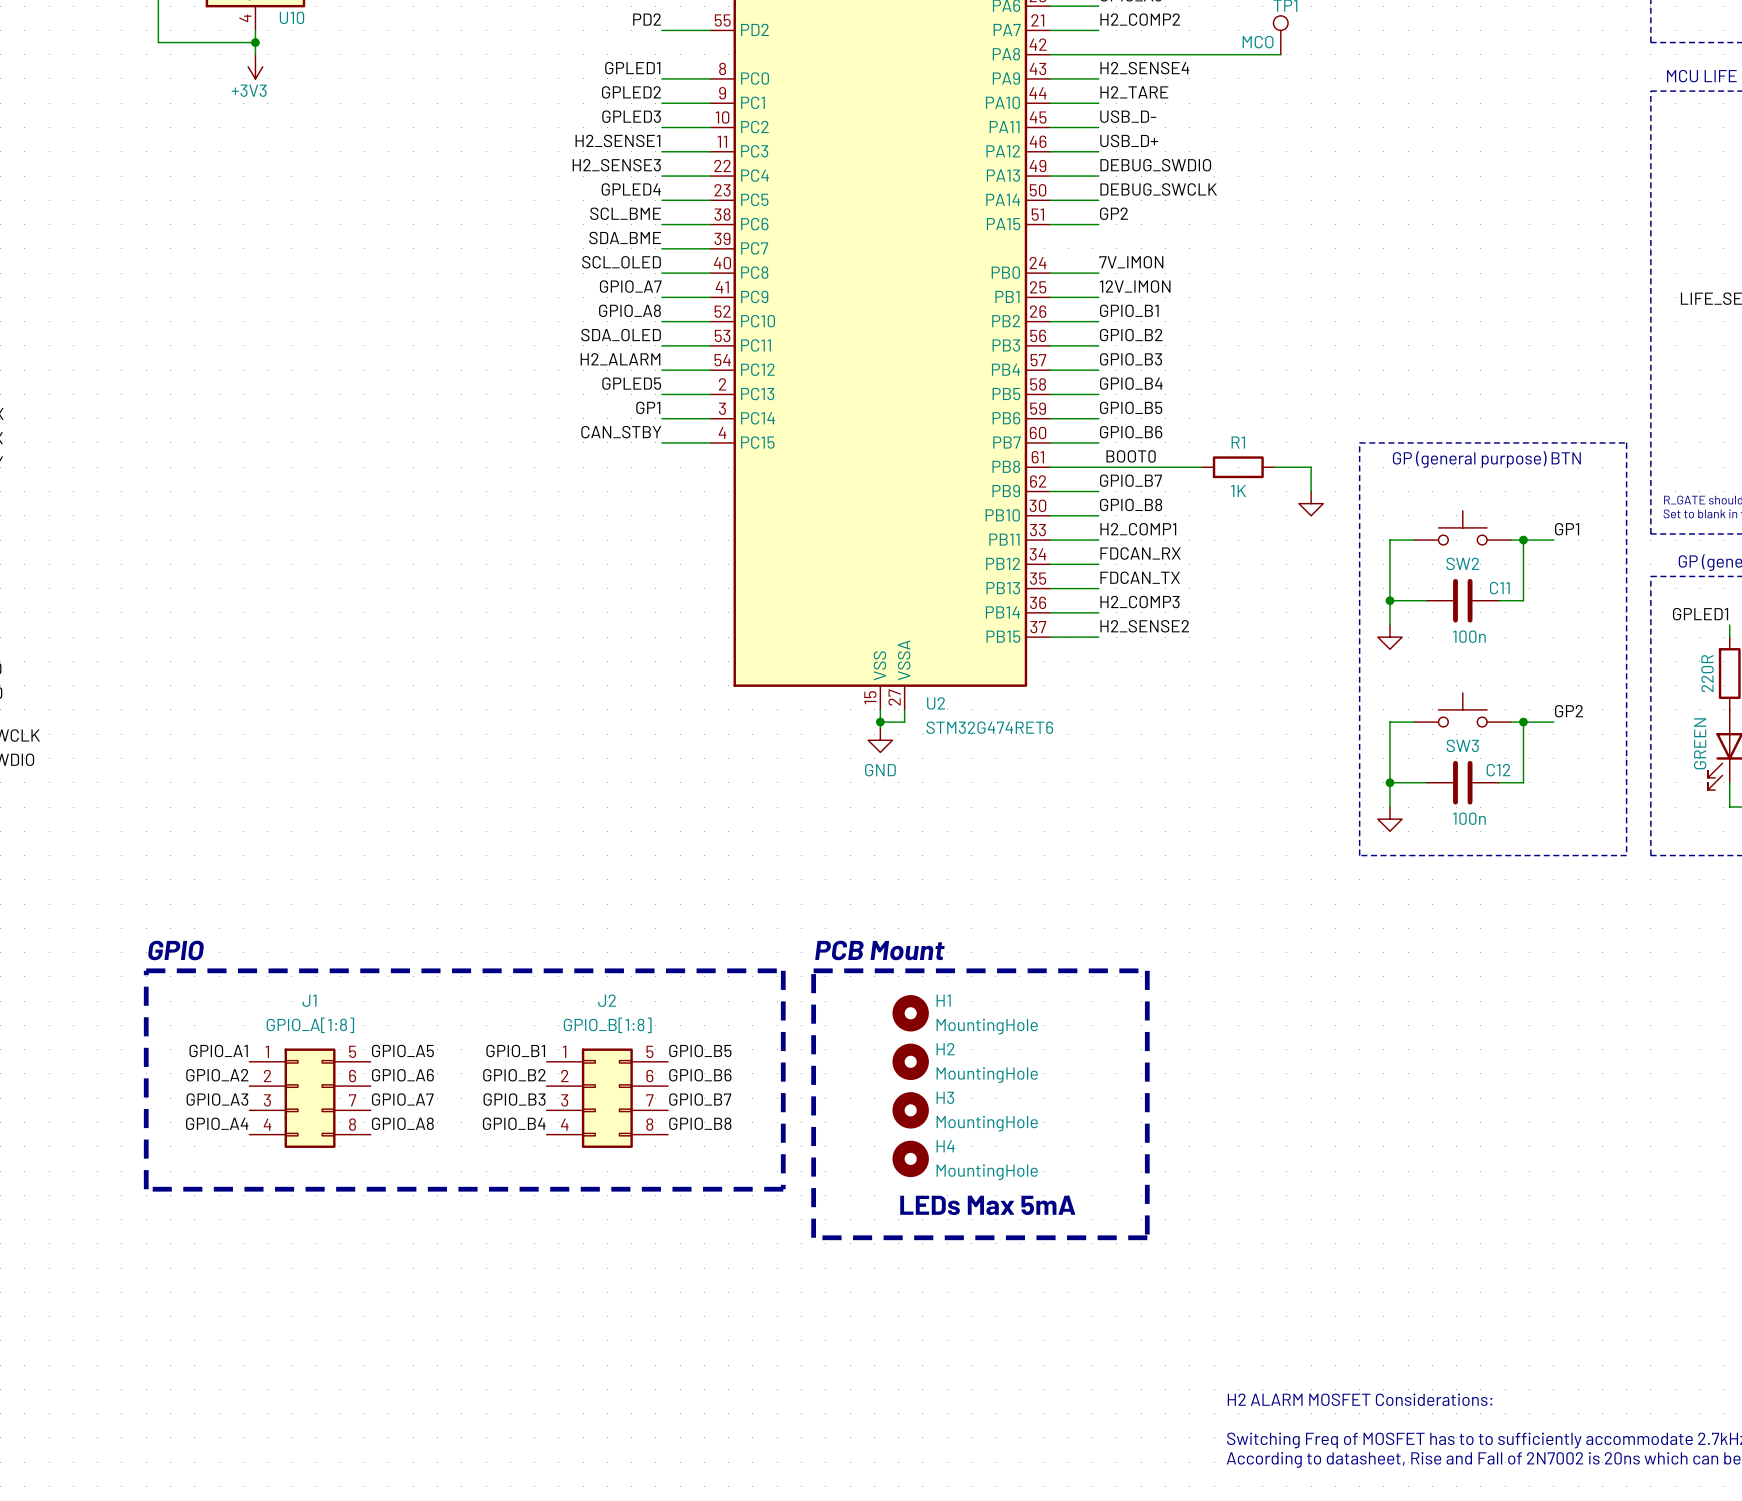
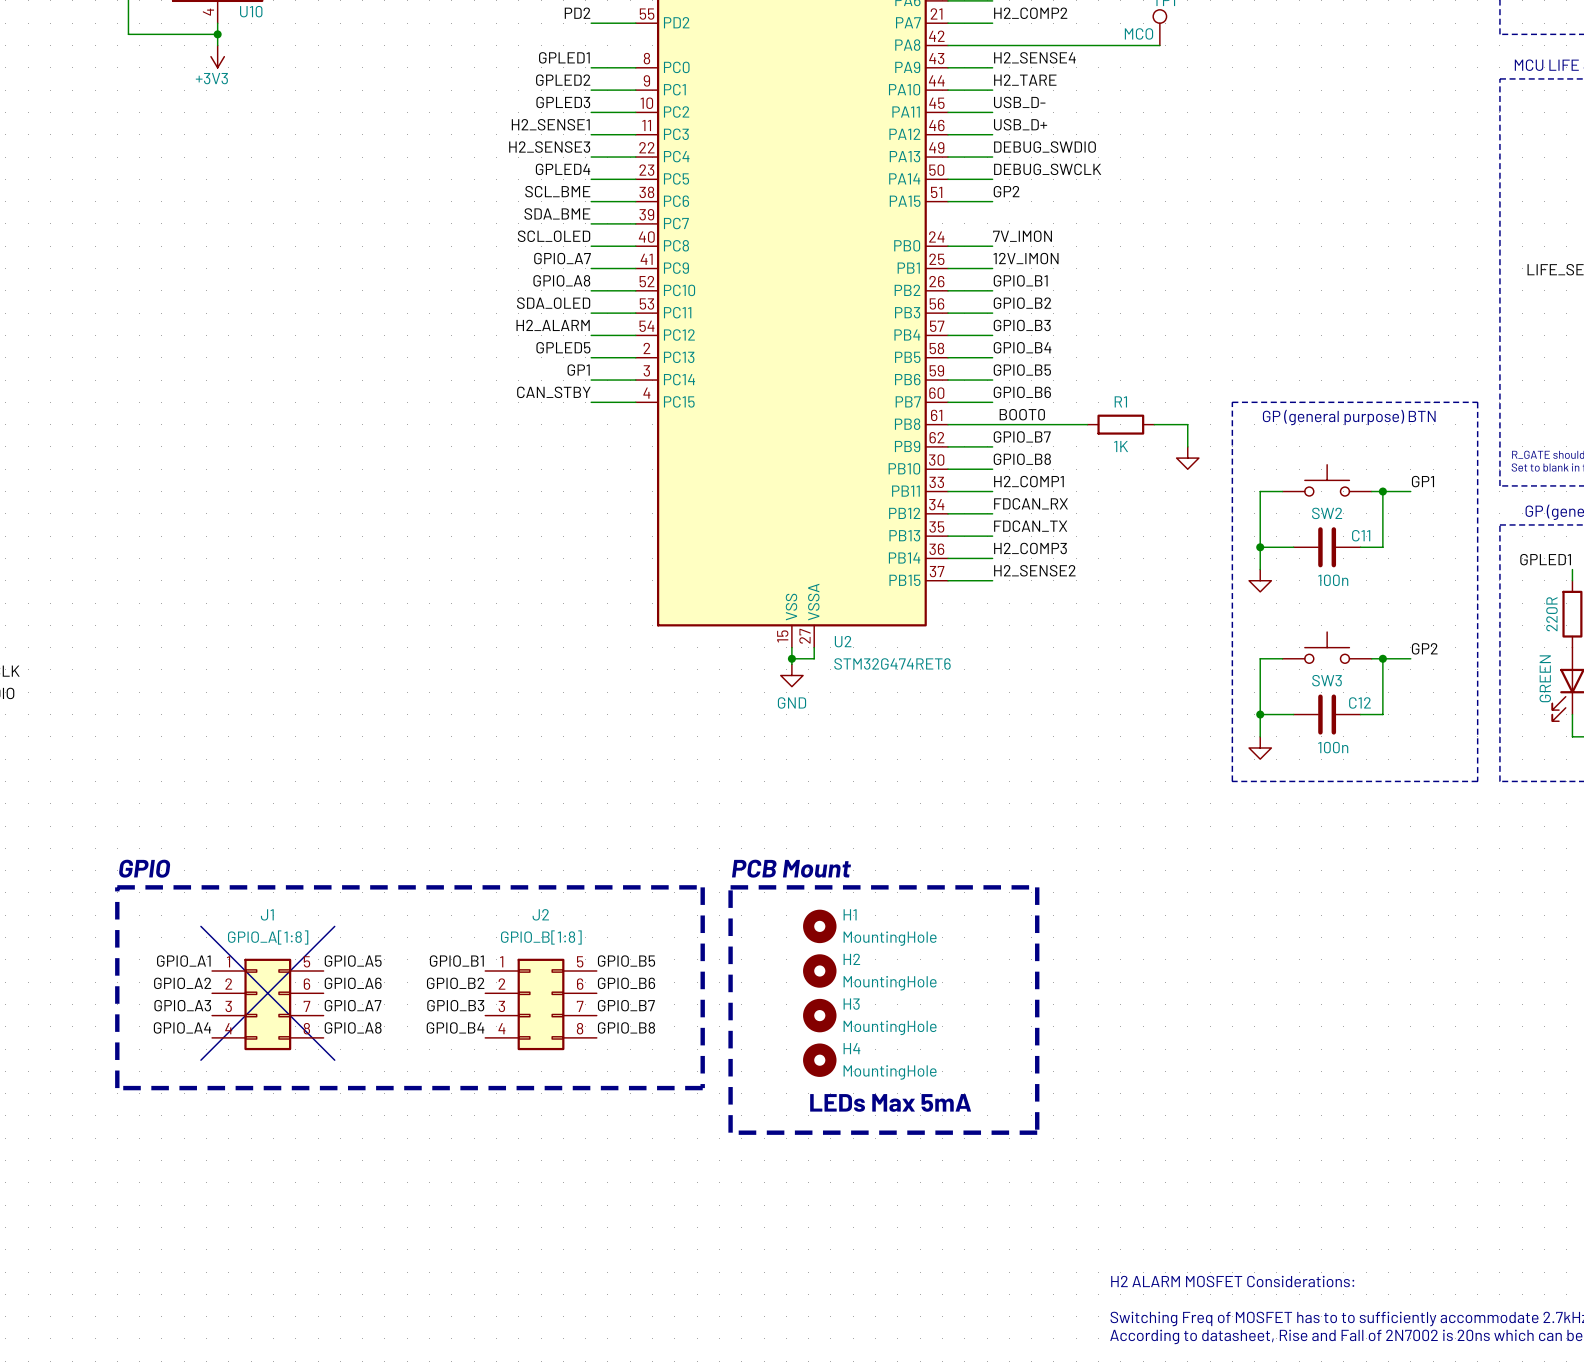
line: none -> (200, 926) (334, 1060)
line: none -> (334, 926) (200, 1060)

